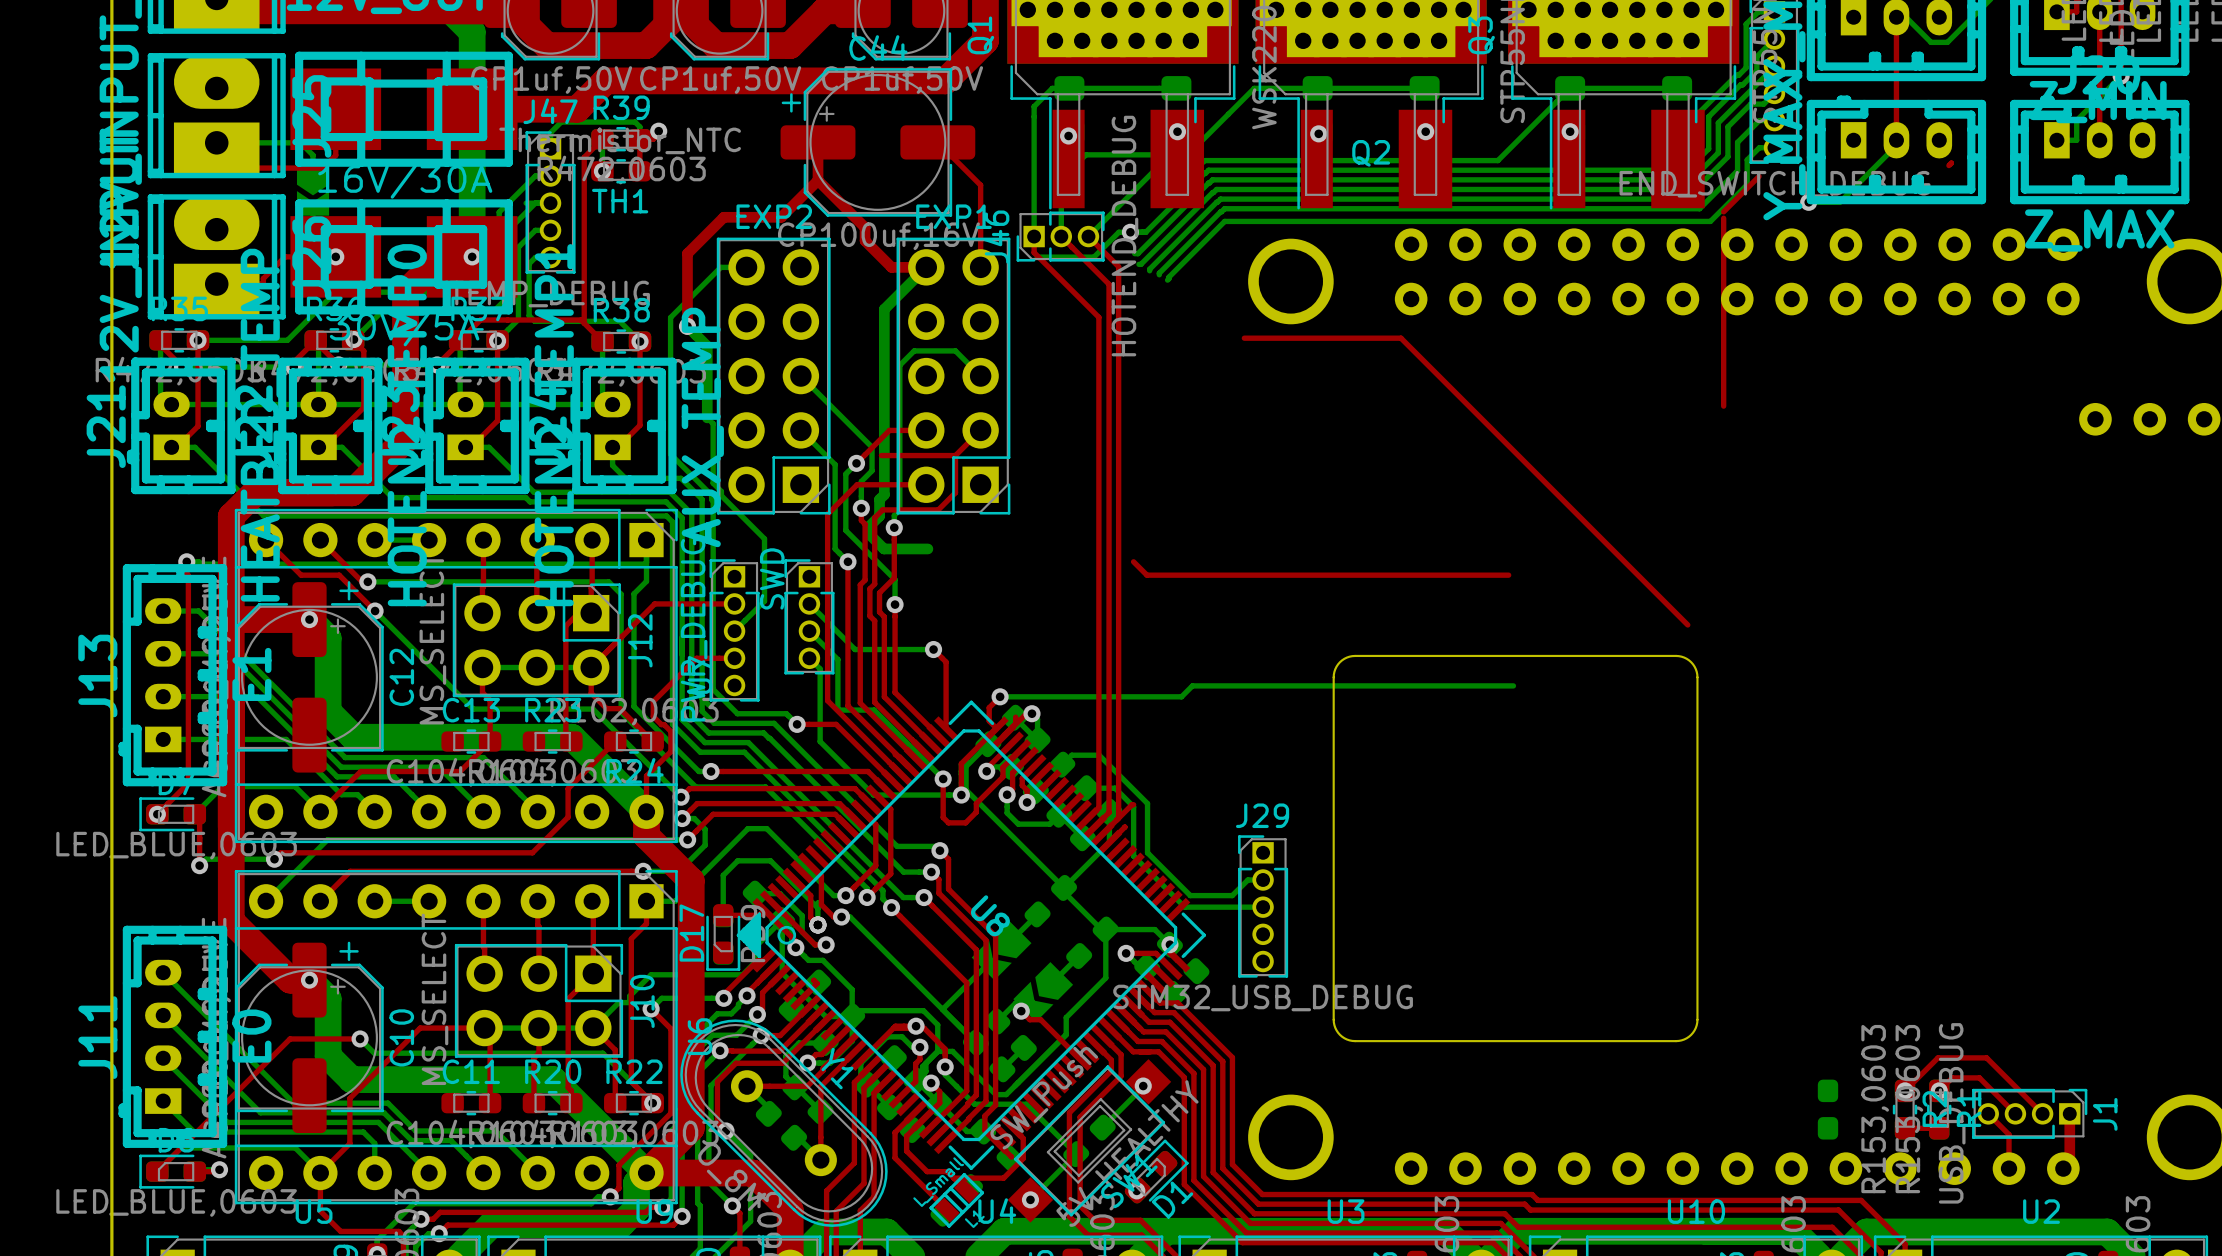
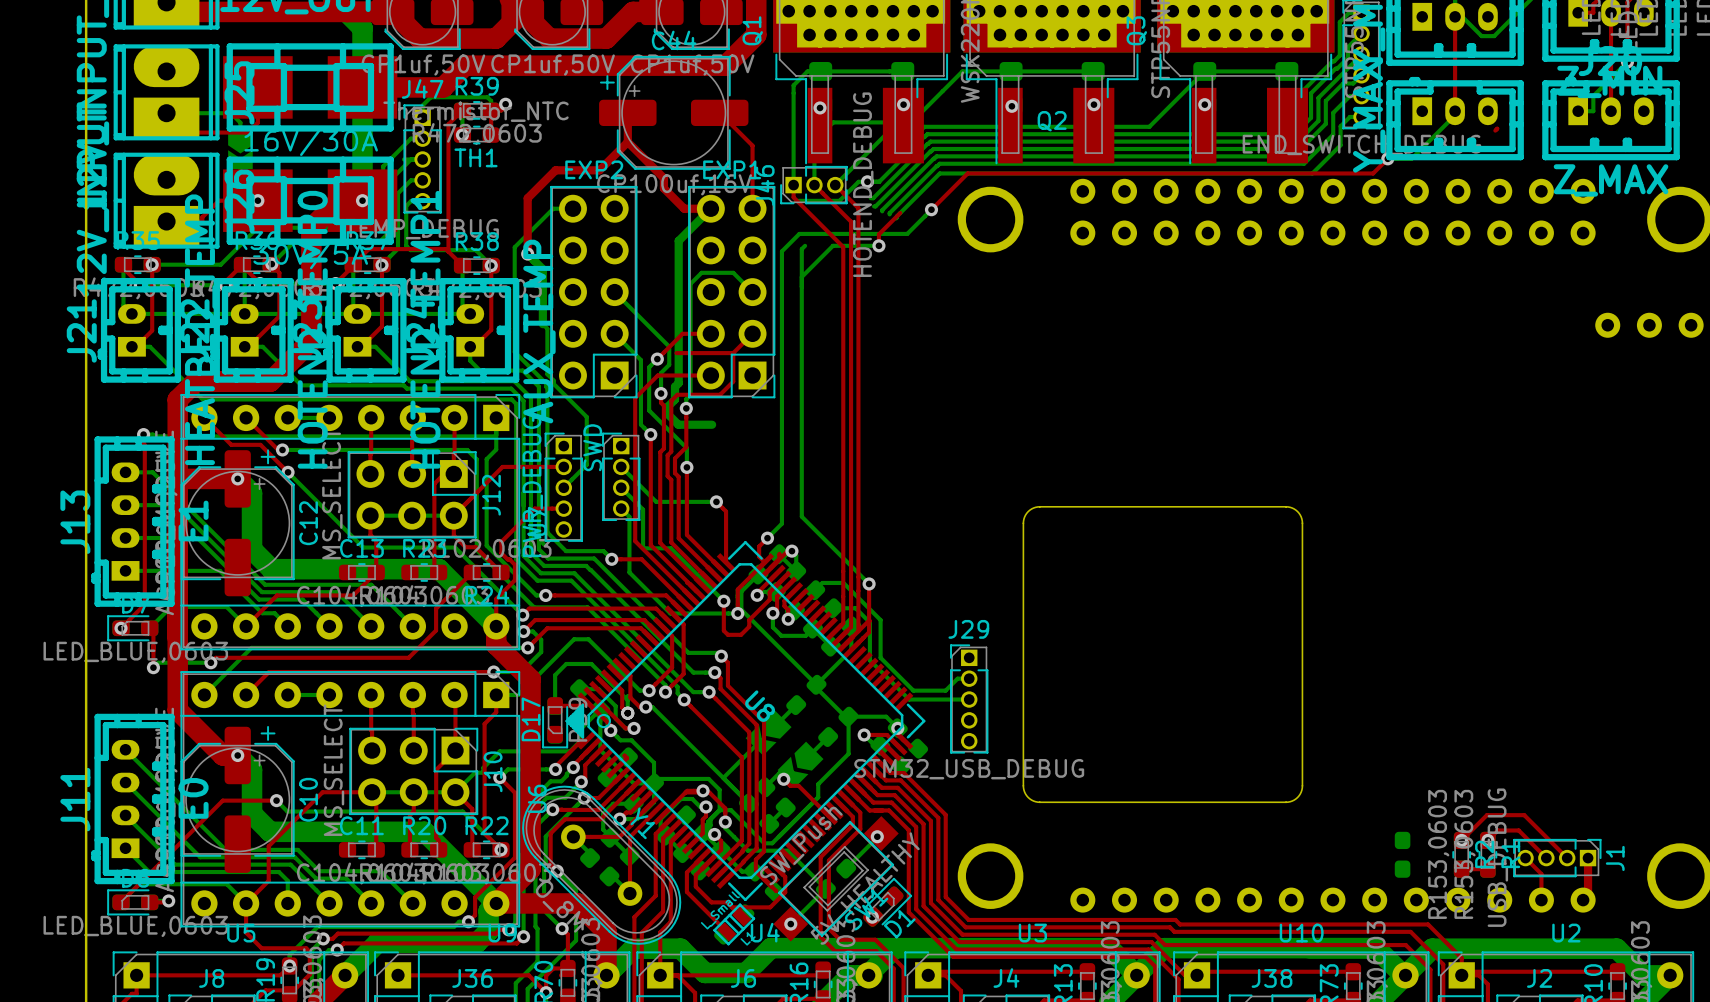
top track: (1759, 176) (1723, 211) -> none
top track: none -> (1387, 158) (1373, 173) (967, 173) (931, 209)
top track: (1723, 218) (1723, 406) -> none
via: none -> (931, 209)
top track: none -> (900, 212) (878, 234) (878, 245)
bottom track: none -> (805, 245) (801, 249) (801, 516) (869, 583)
bottom track: none -> (878, 245) (832, 245) (801, 277)
via: none -> (878, 245)
top track: (1244, 338) (1401, 338) (1687, 624) -> none
top track: (1133, 561) (1146, 575) (1508, 575) -> none
bottom track: (1513, 685) (1192, 685) (1181, 696) (1000, 696) -> (931, 209) (907, 233) (799, 233) (781, 251) (781, 523) (767, 538)
top track: none -> (869, 583) (869, 632) (863, 638)
via: none -> (869, 583)

